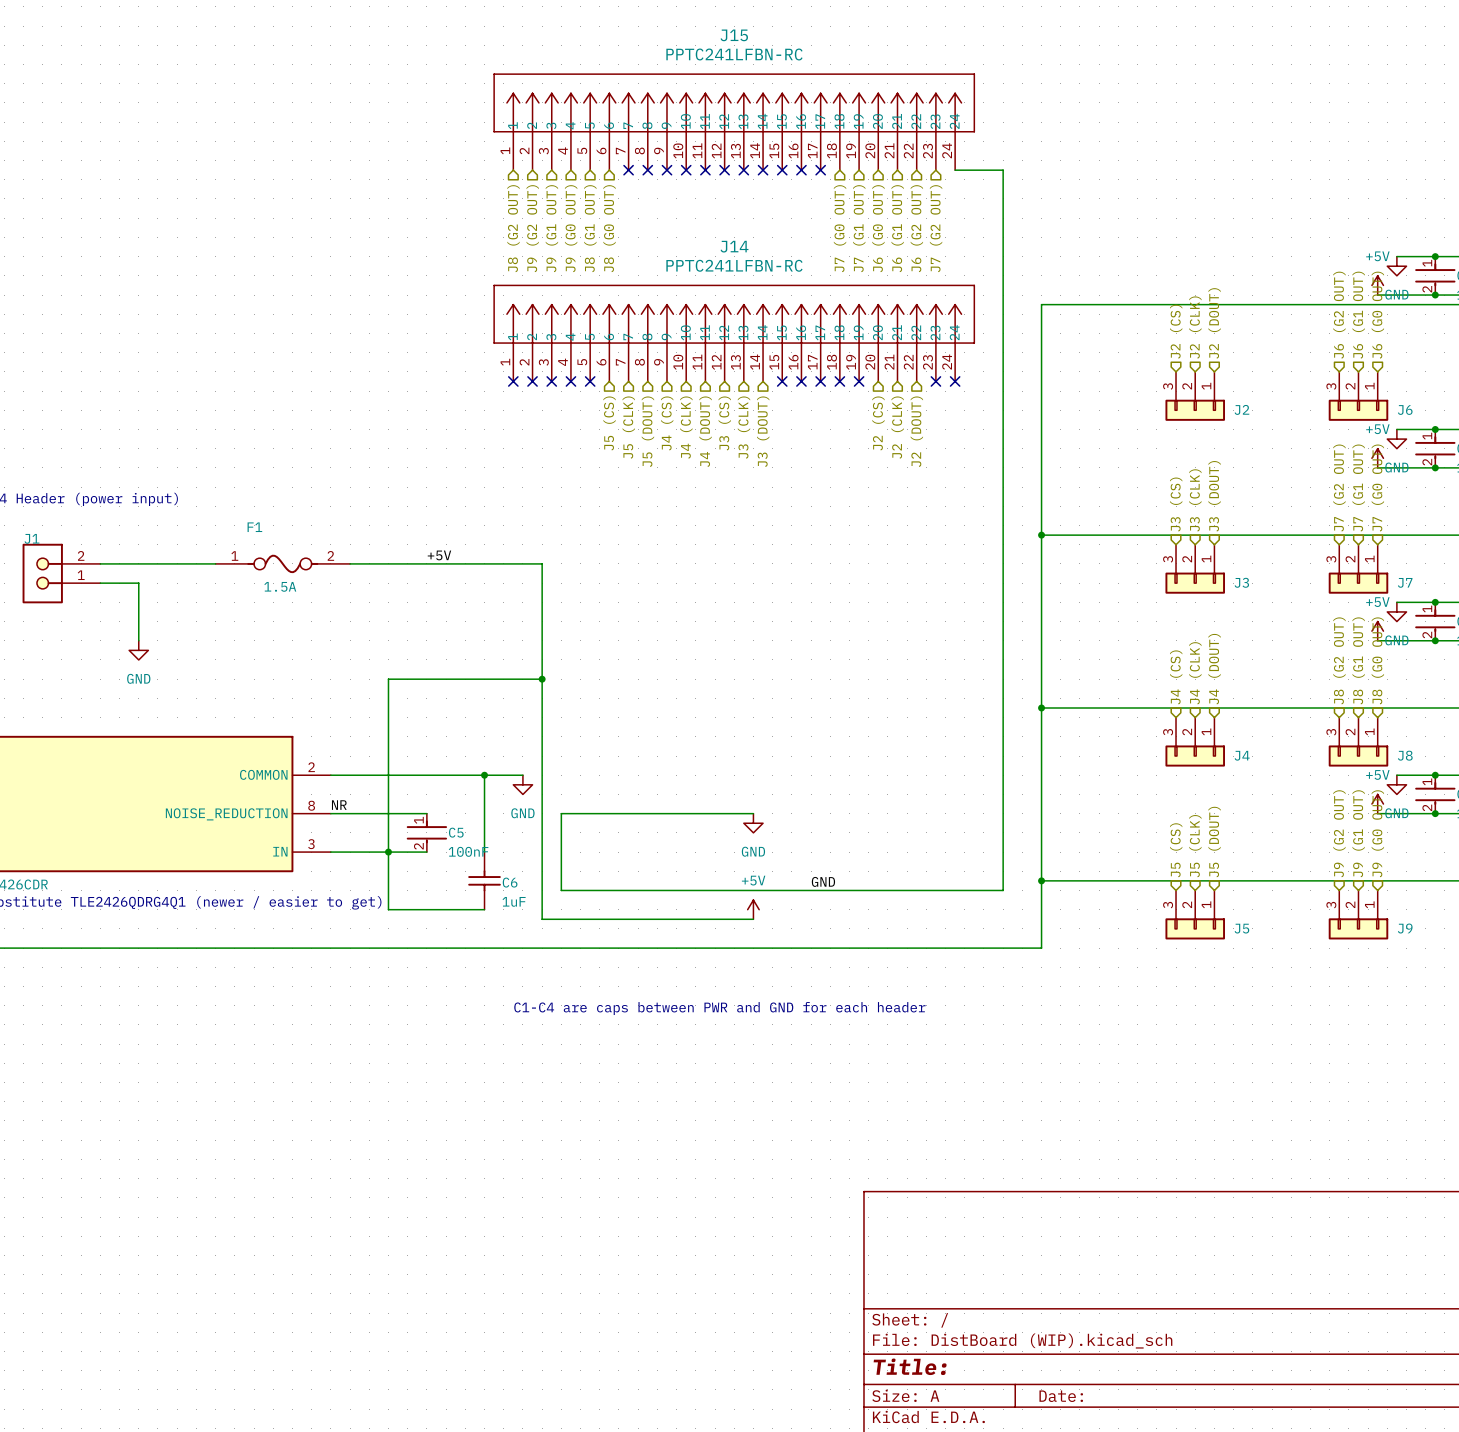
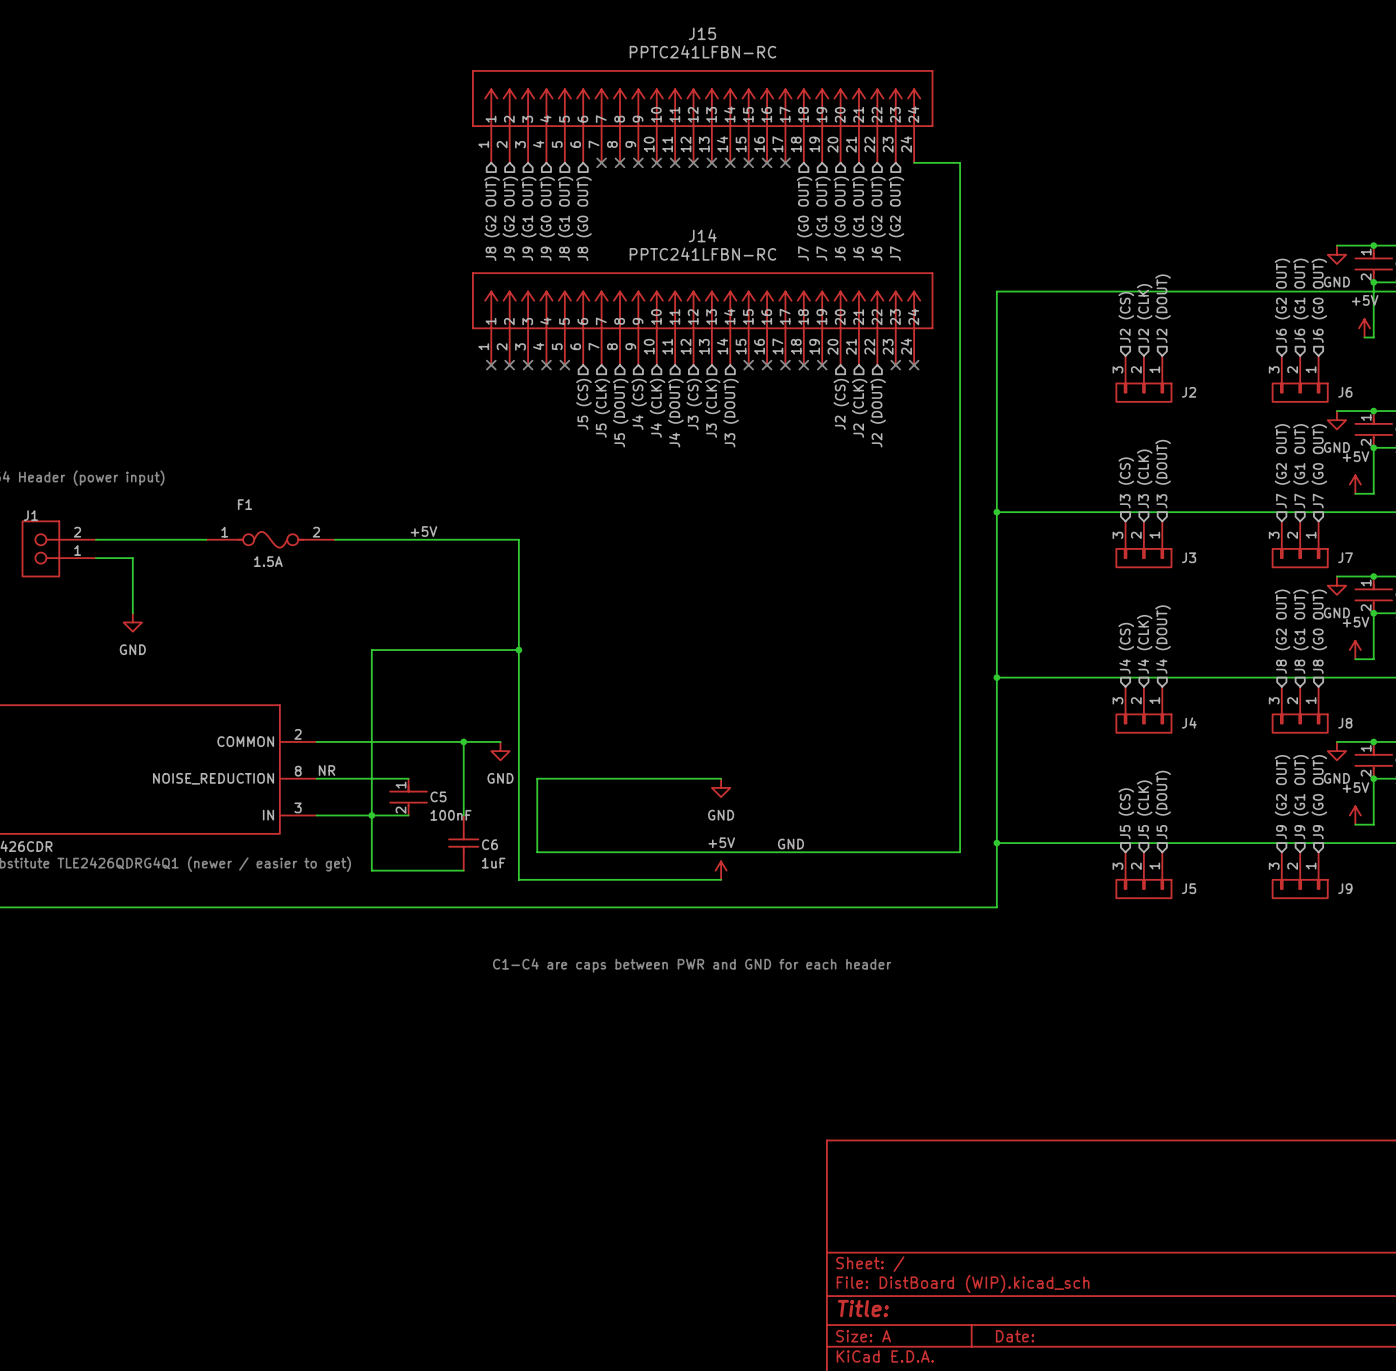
power symbol: +5V (1377, 285) -> none
wire: (1377, 295) (1435, 295) -> (1364, 337) (1373, 337) (1373, 282)
power symbol: none -> +5V (1364, 328)
power symbol position: +5V (1377, 458) -> +5V (1355, 484)
wire: (1377, 467) (1435, 467) -> (1355, 493) (1373, 493) (1373, 447)
power symbol position: +5V (1377, 631) -> +5V (1355, 650)
wire: (1377, 640) (1435, 640) -> (1355, 659) (1373, 659) (1373, 613)
power symbol position: +5V (1377, 804) -> +5V (1355, 815)
wire: (1377, 813) (1435, 813) -> (1355, 824) (1373, 824) (1373, 778)

